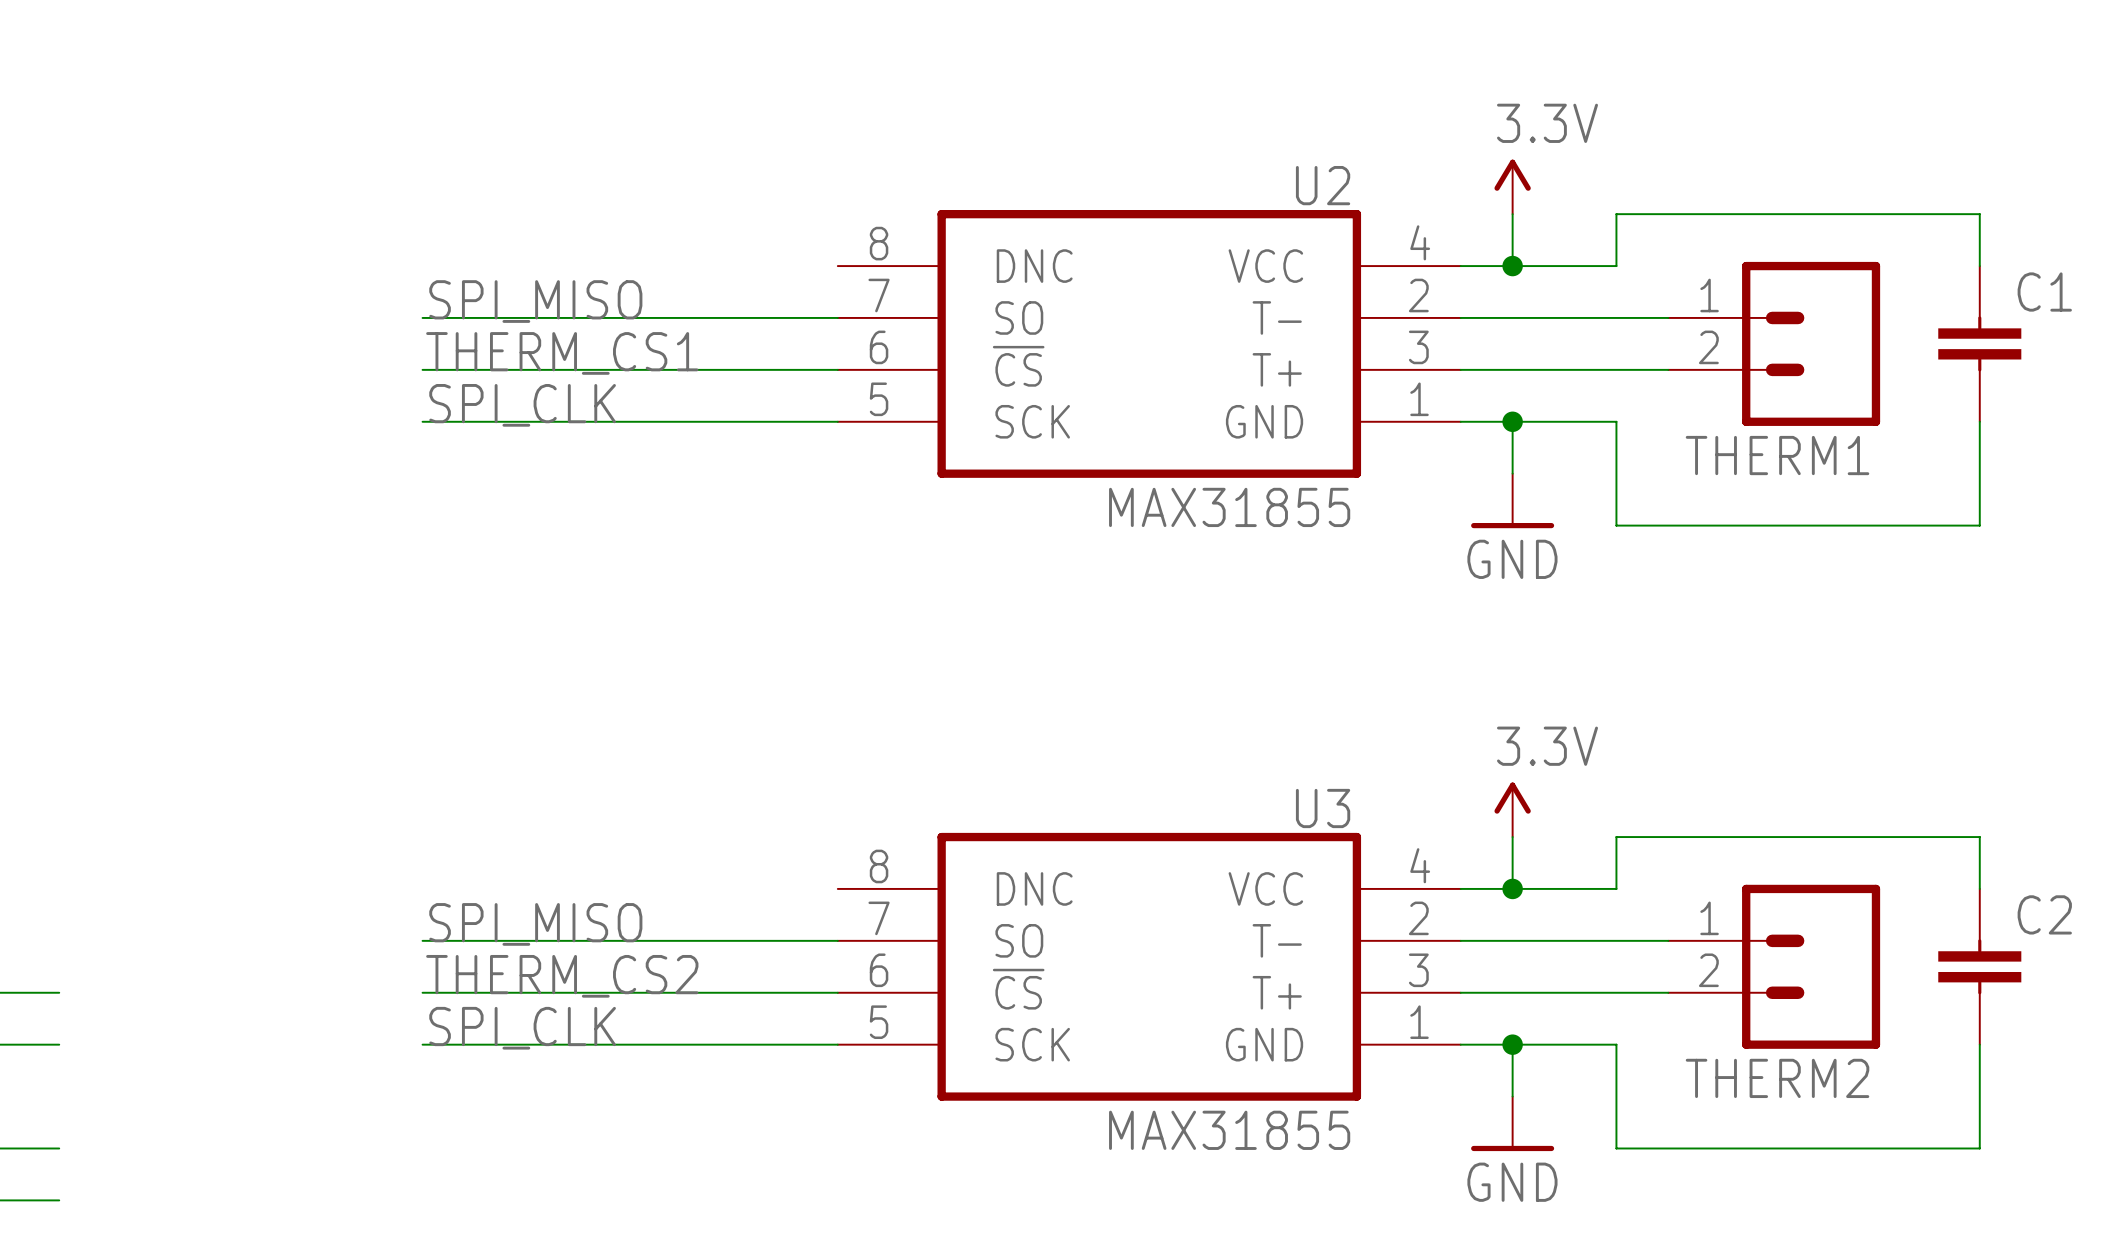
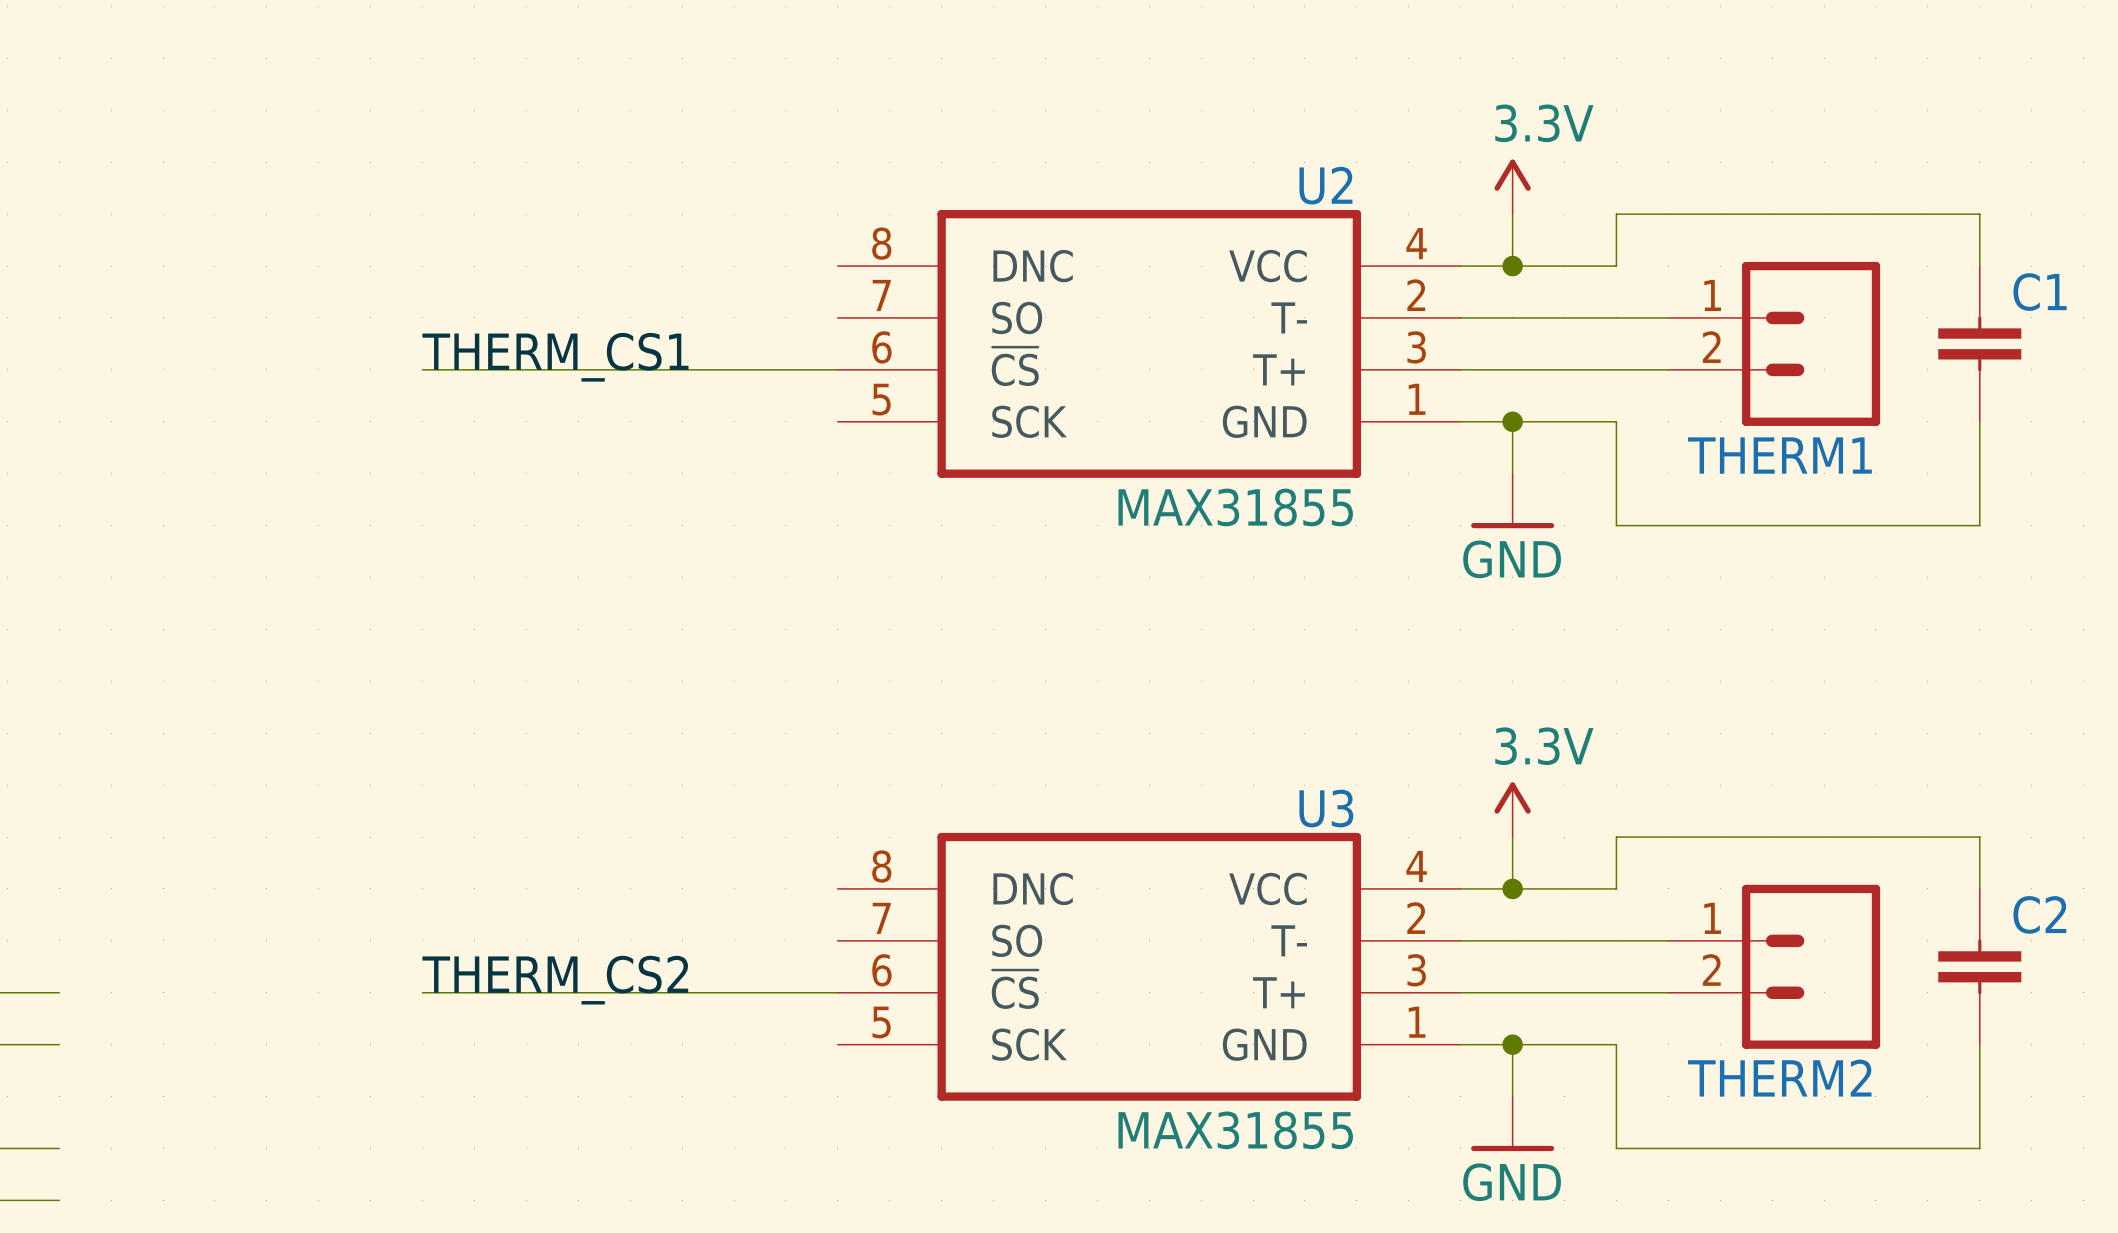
label: SPI_MISO (535, 301) -> none
wire: (422, 317) (837, 317) -> none
label: SPI_CLK (522, 405) -> none
wire: (422, 421) (837, 421) -> none
label: SPI_MISO (535, 924) -> none
wire: (422, 940) (837, 940) -> none
label: SPI_CLK (522, 1028) -> none
wire: (422, 1044) (837, 1044) -> none

